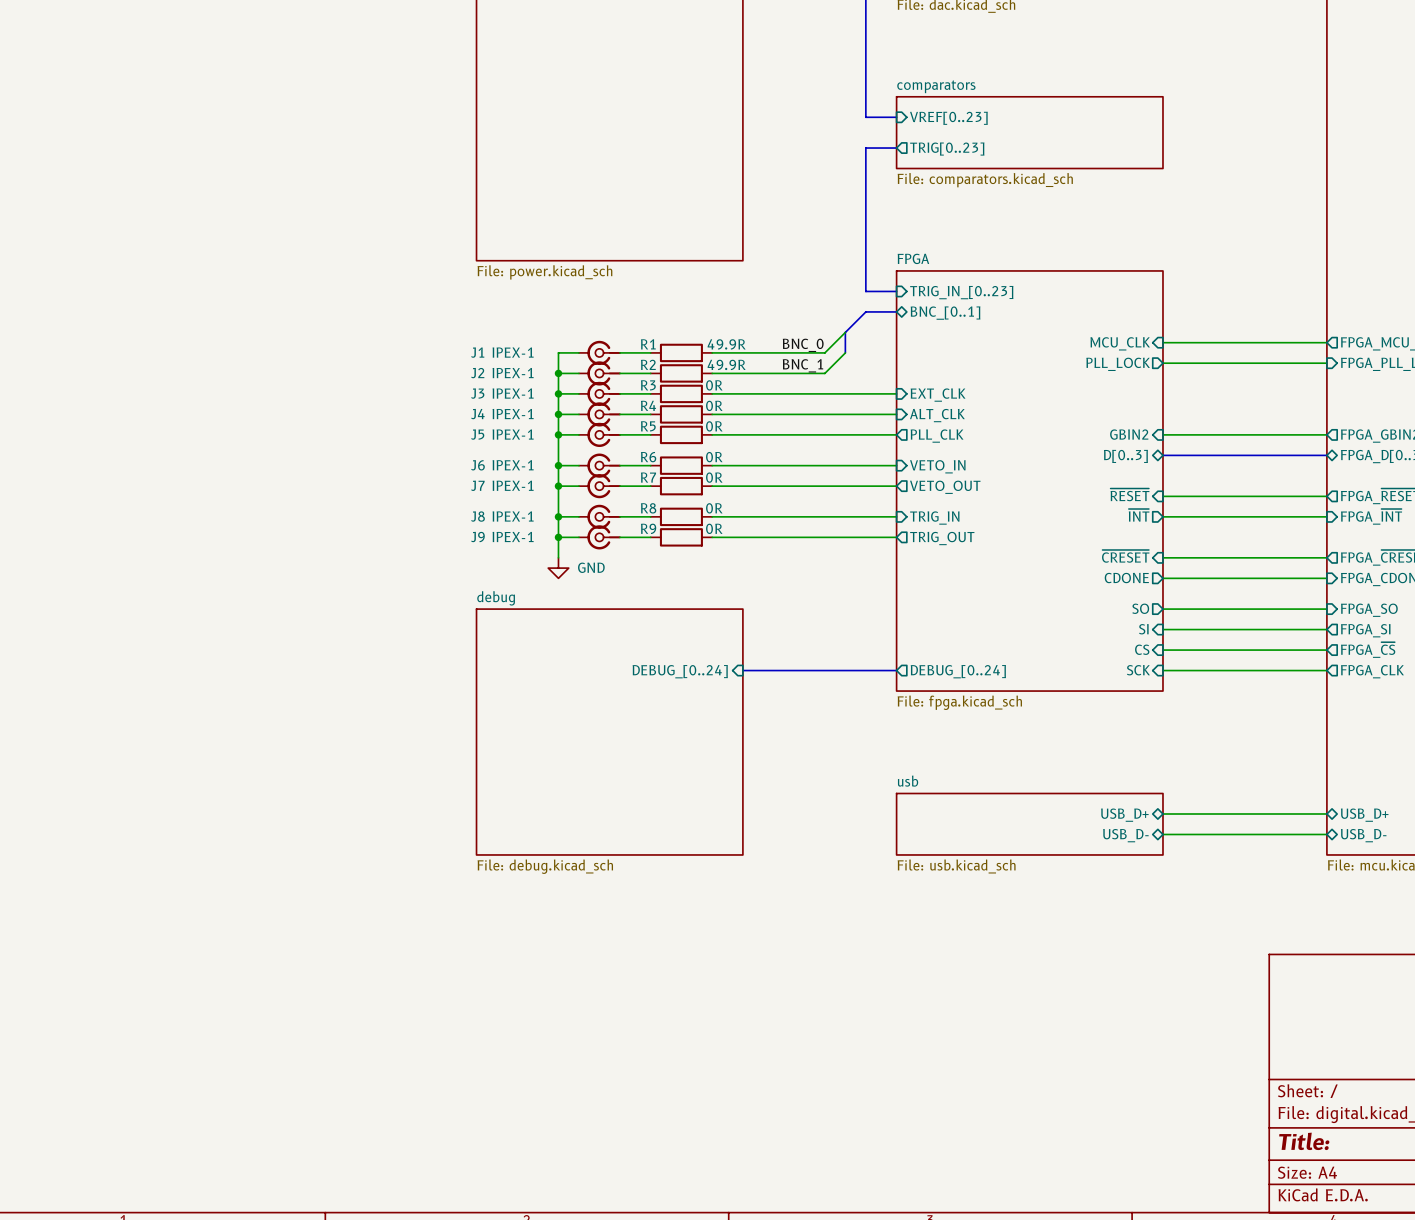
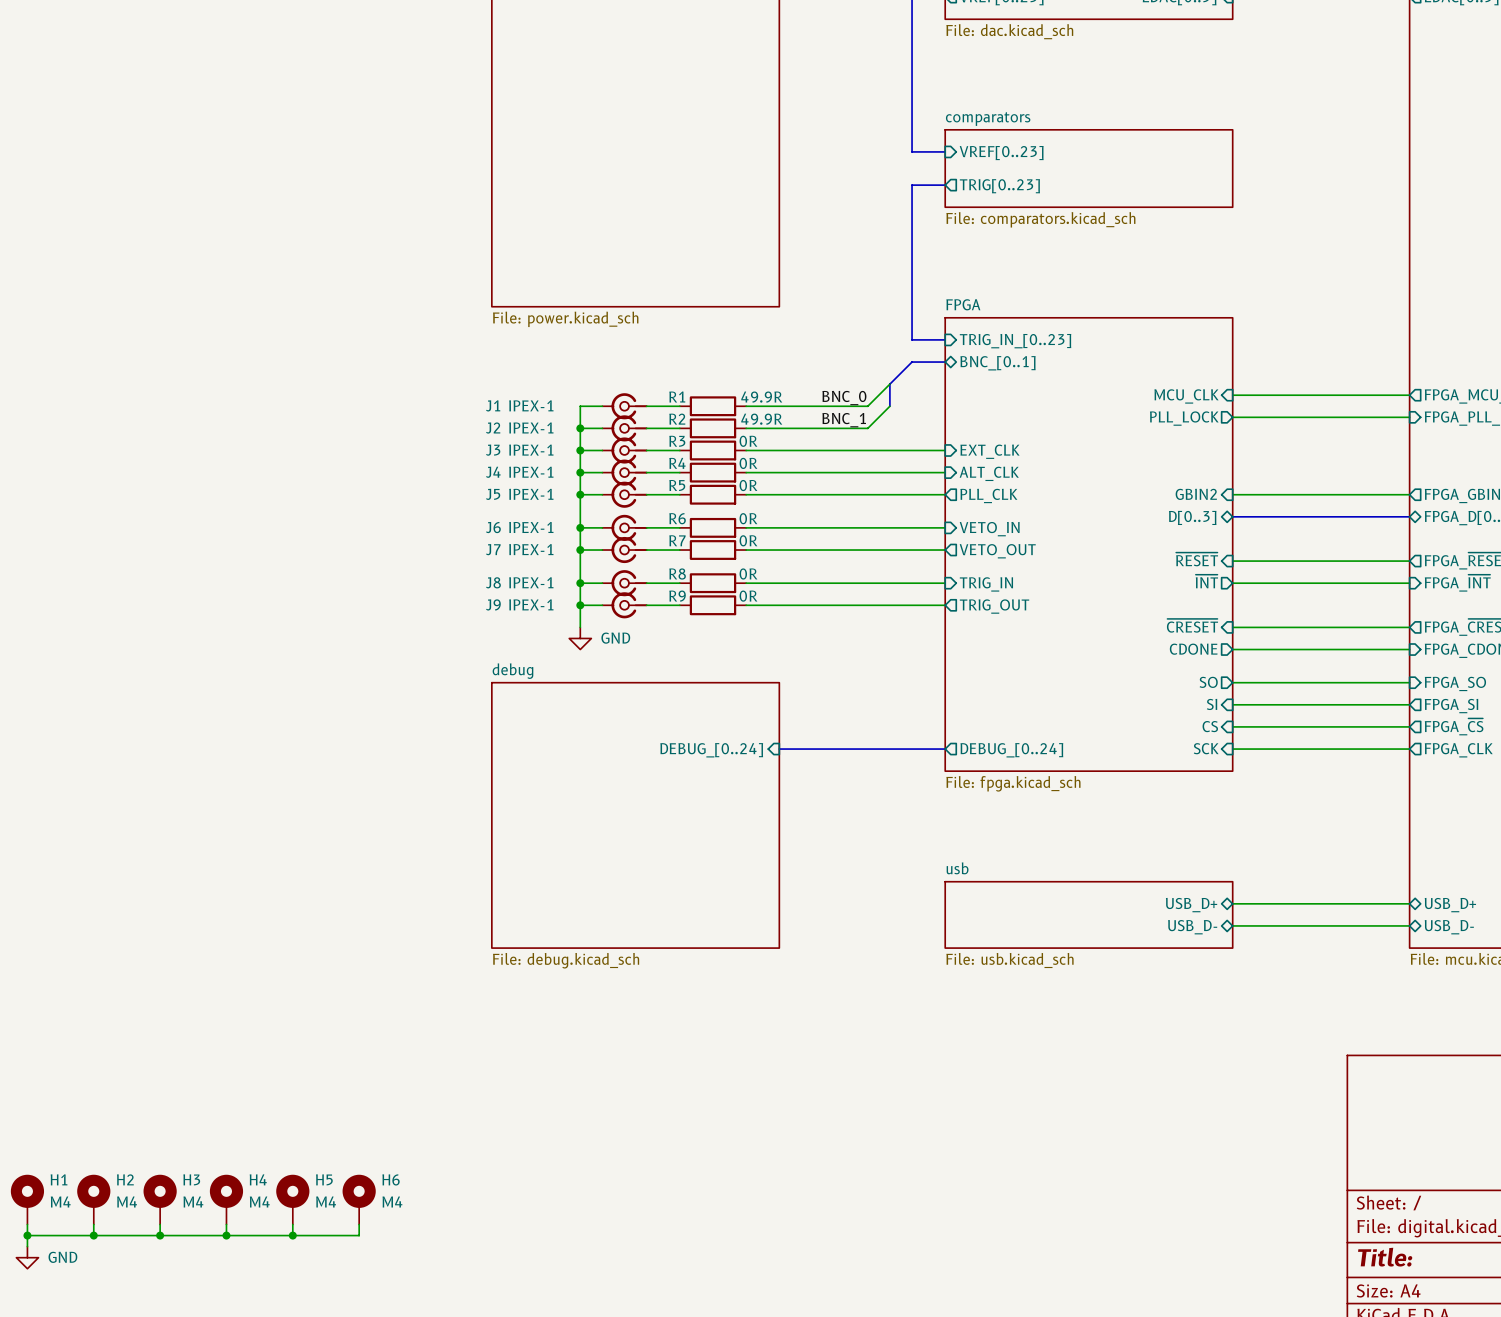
H1: none -> M4 (27, 1199)
H2: none -> M4 (93, 1199)
H3: none -> M4 (160, 1199)
H4: none -> M4 (226, 1199)
H5: none -> M4 (292, 1199)
H6: none -> M4 (359, 1199)
wire: none -> (27, 1224) (27, 1246)
wire: none -> (93, 1224) (93, 1235)
wire: none -> (160, 1224) (160, 1235)
wire: none -> (226, 1224) (226, 1235)
wire: none -> (292, 1224) (292, 1235)
wire: none -> (359, 1224) (359, 1235) (27, 1235)
junction: none -> (27, 1235)
junction: none -> (93, 1235)
junction: none -> (160, 1235)
junction: none -> (226, 1235)
junction: none -> (292, 1235)
power symbol: none -> GND (27, 1257)

